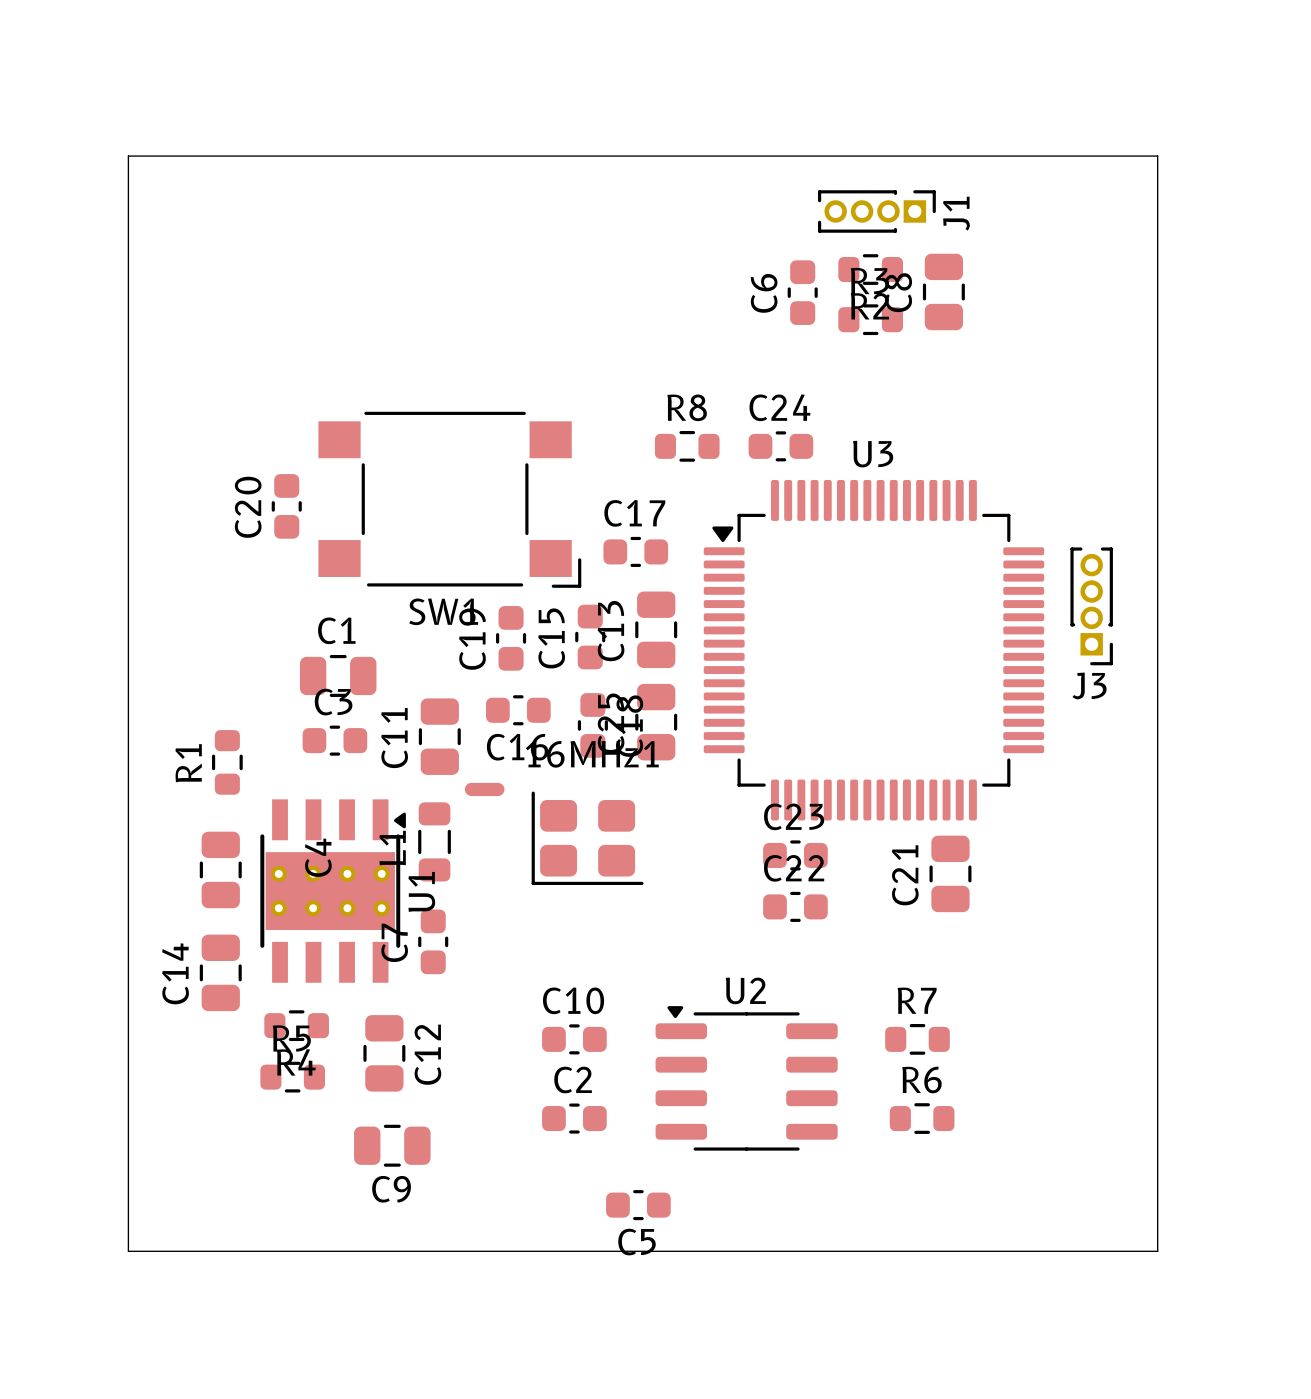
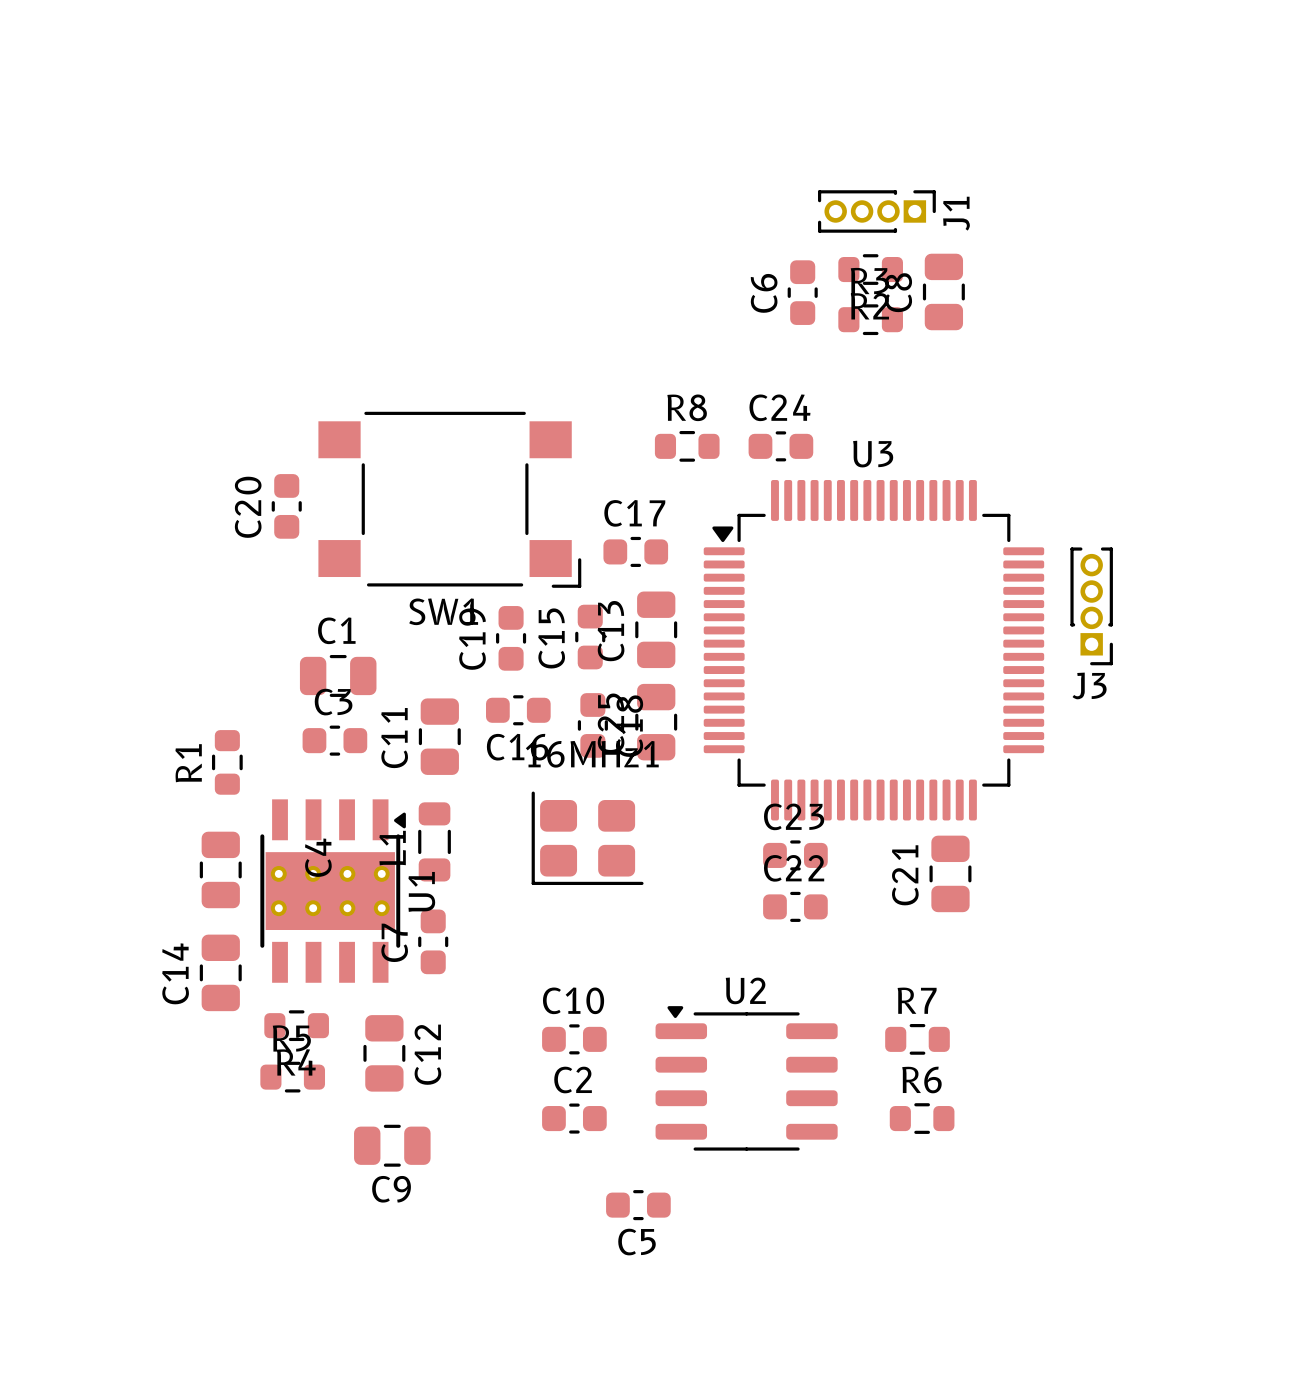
board edge: (128, 156) (128, 1251) (1157, 1251) (1157, 156) (128, 156) -> none
part: (484, 789) -> none

